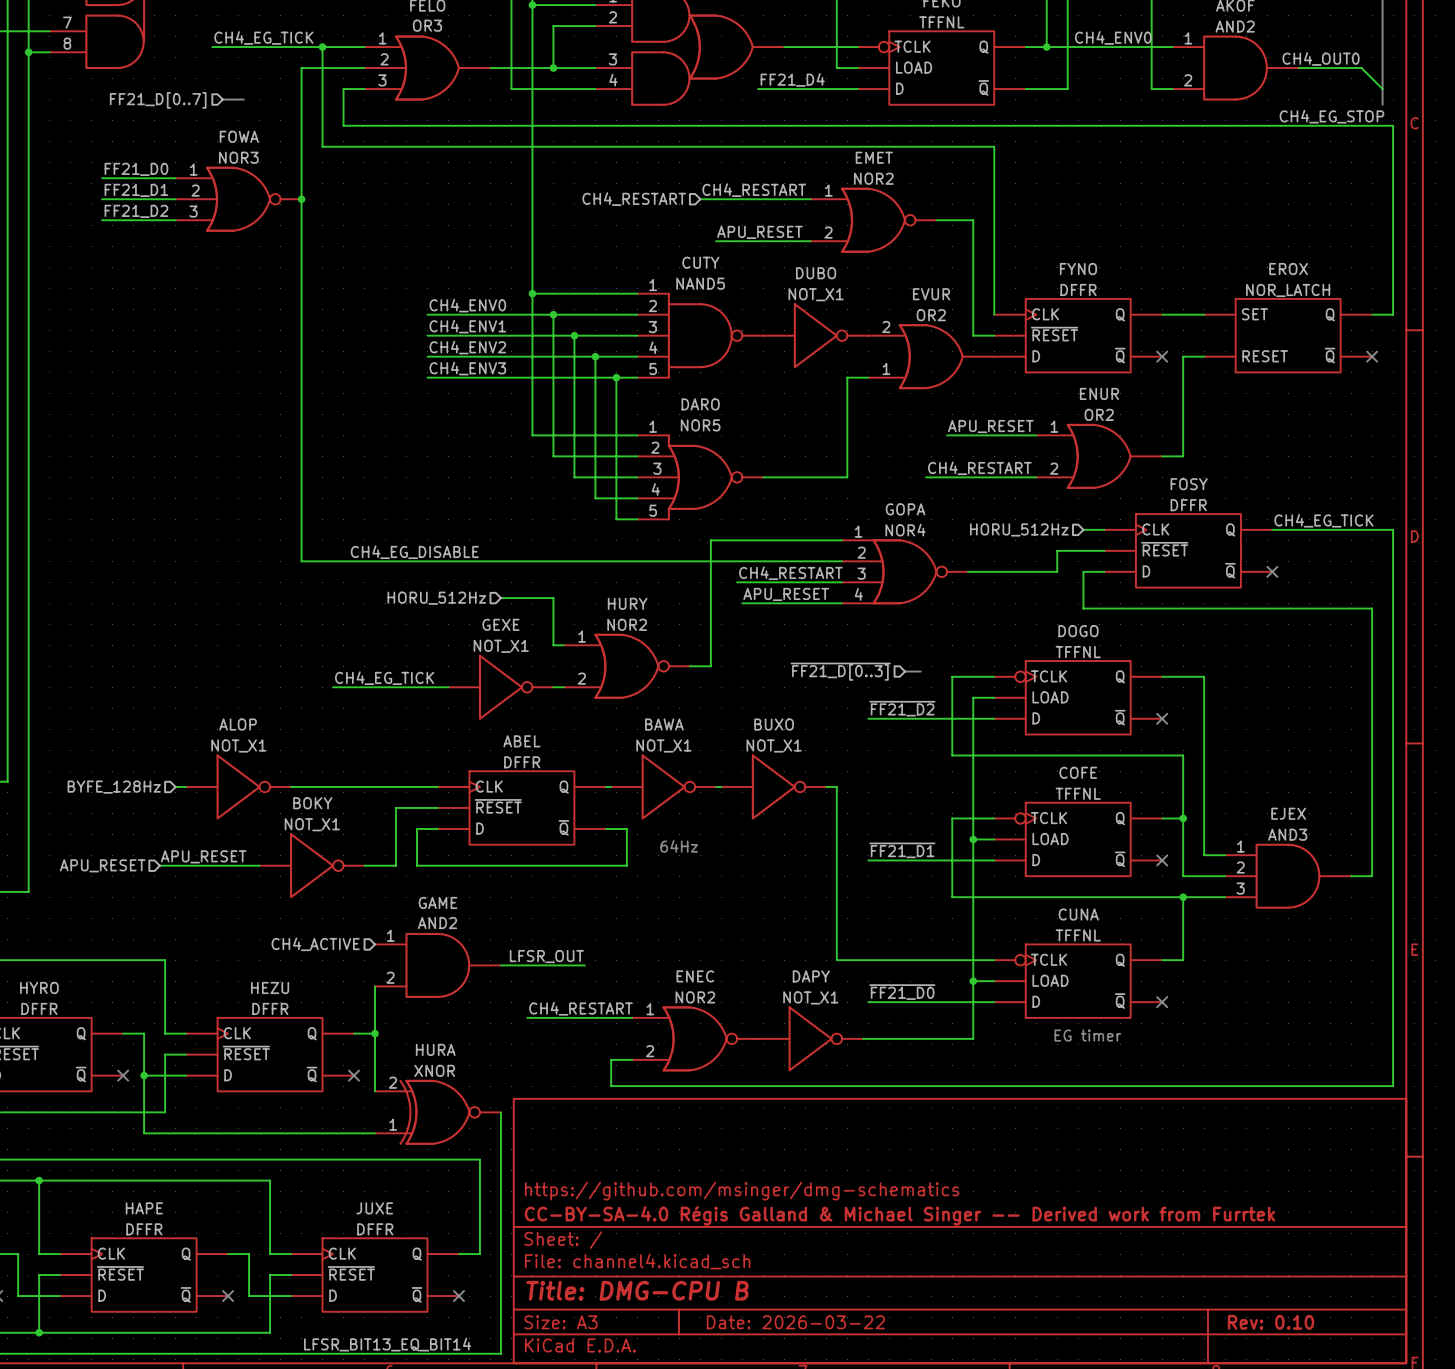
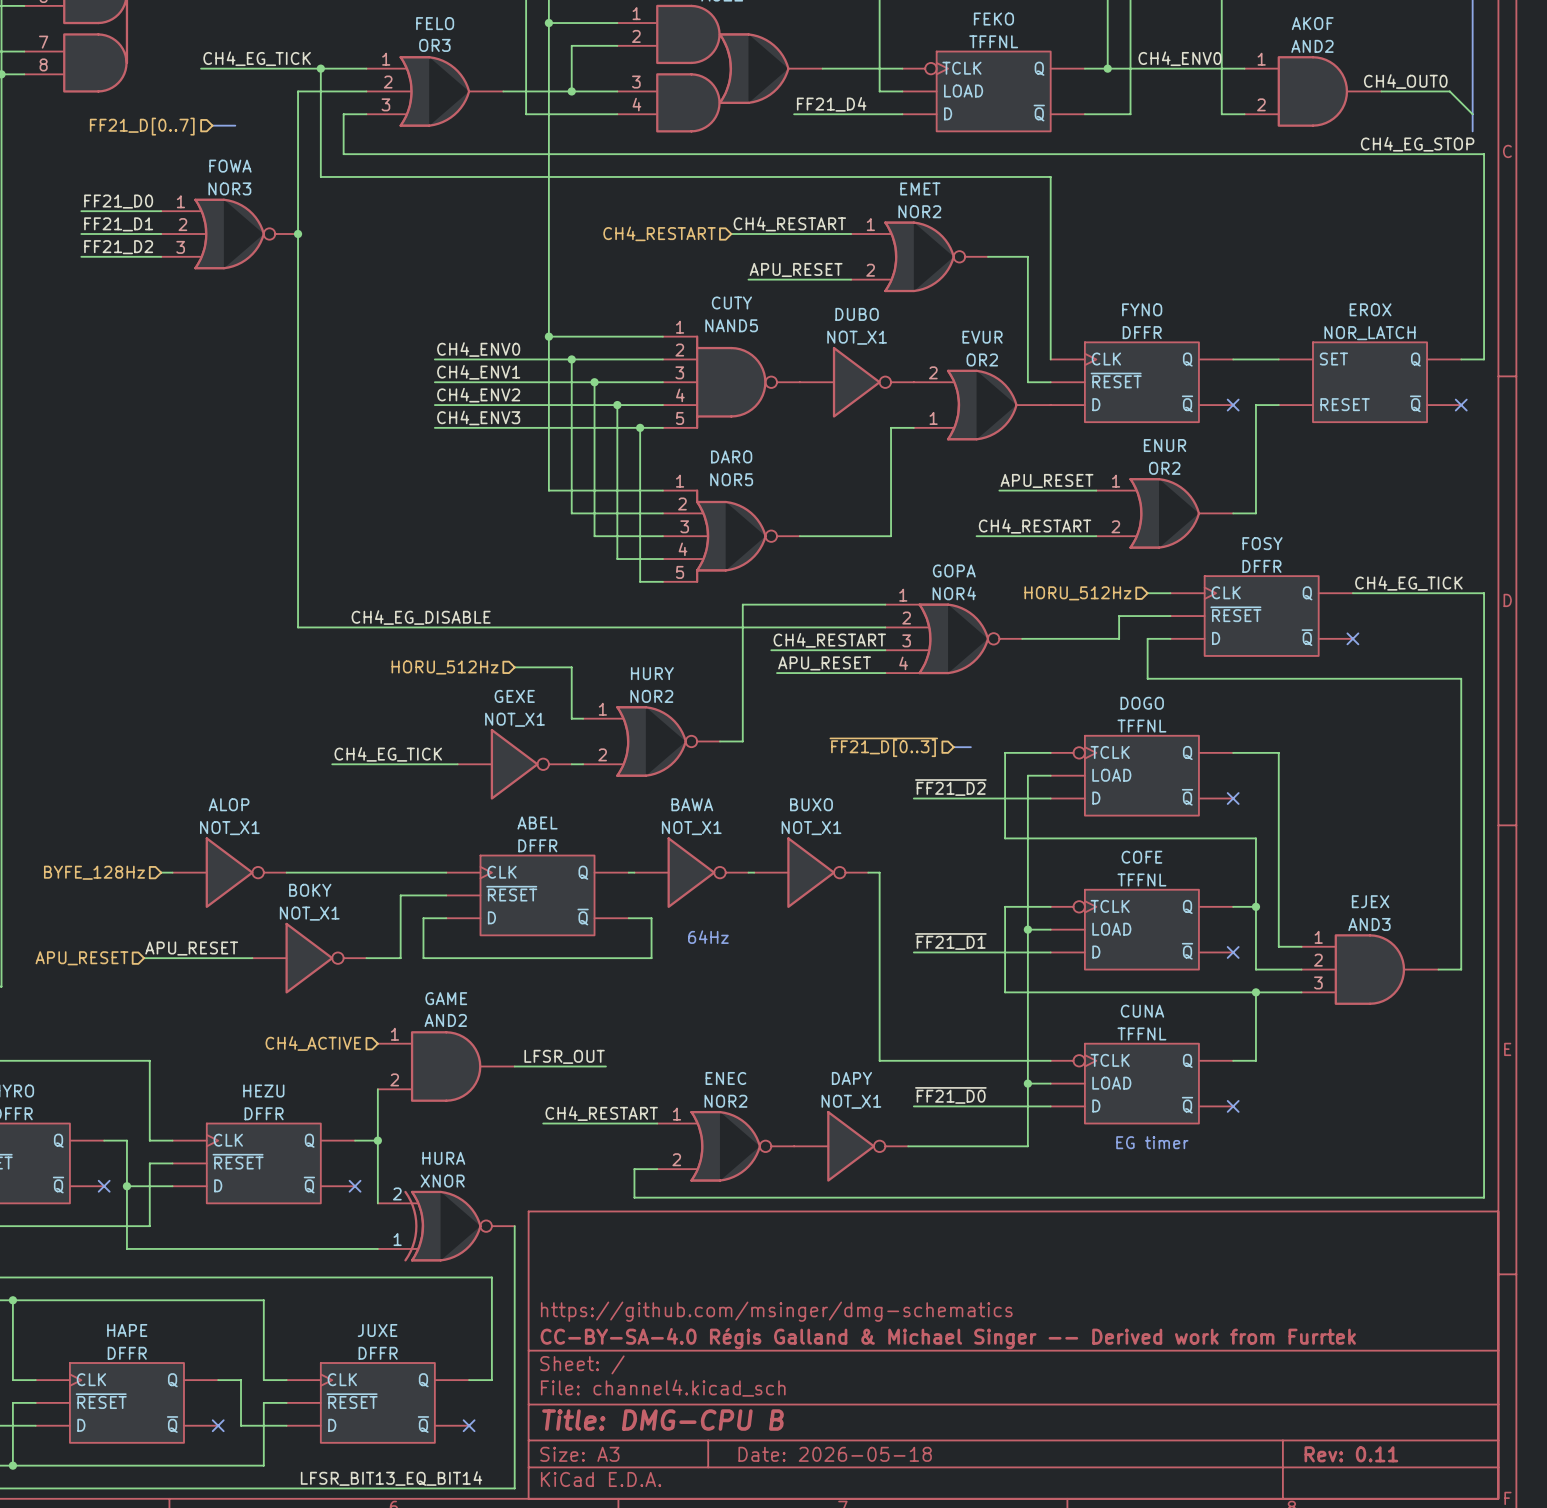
title block: Date: 2026-03-22 (795, 1322) -> Date: 2026-05-18 (835, 1454)
title block: Rev: 0.10 (1270, 1322) -> Rev: 0.11 (1351, 1454)

